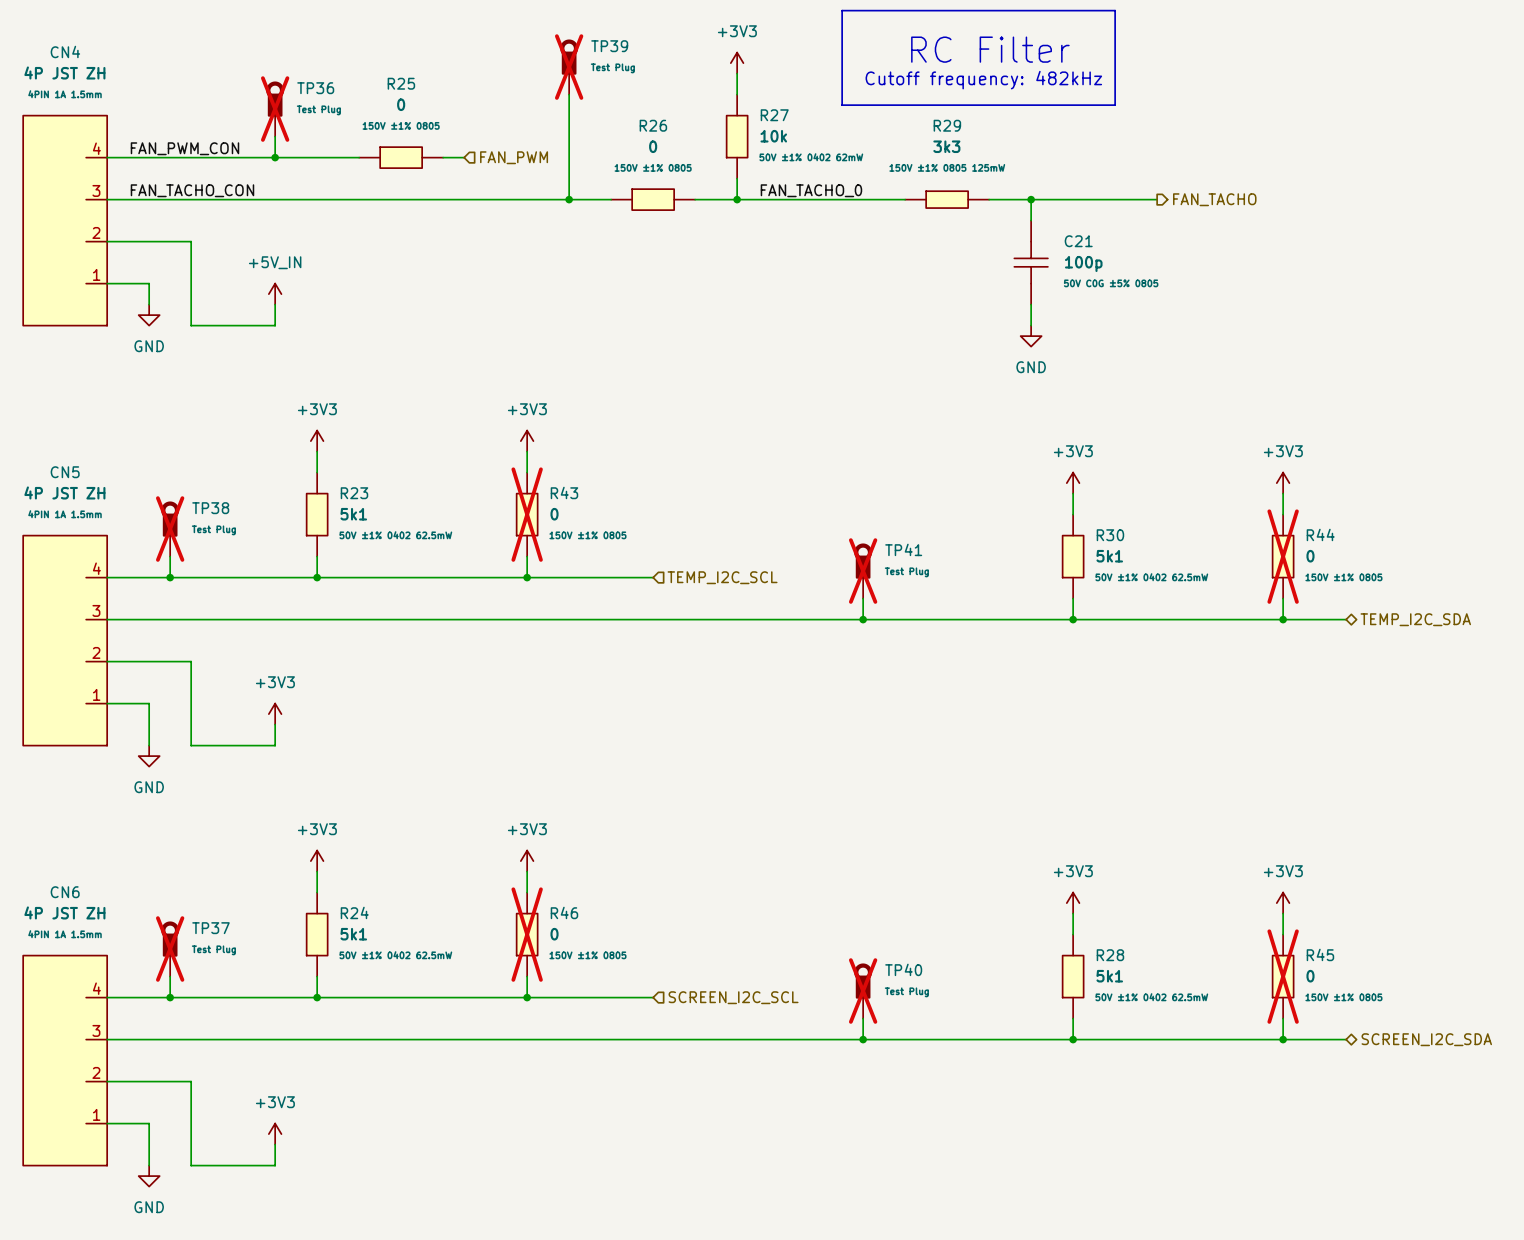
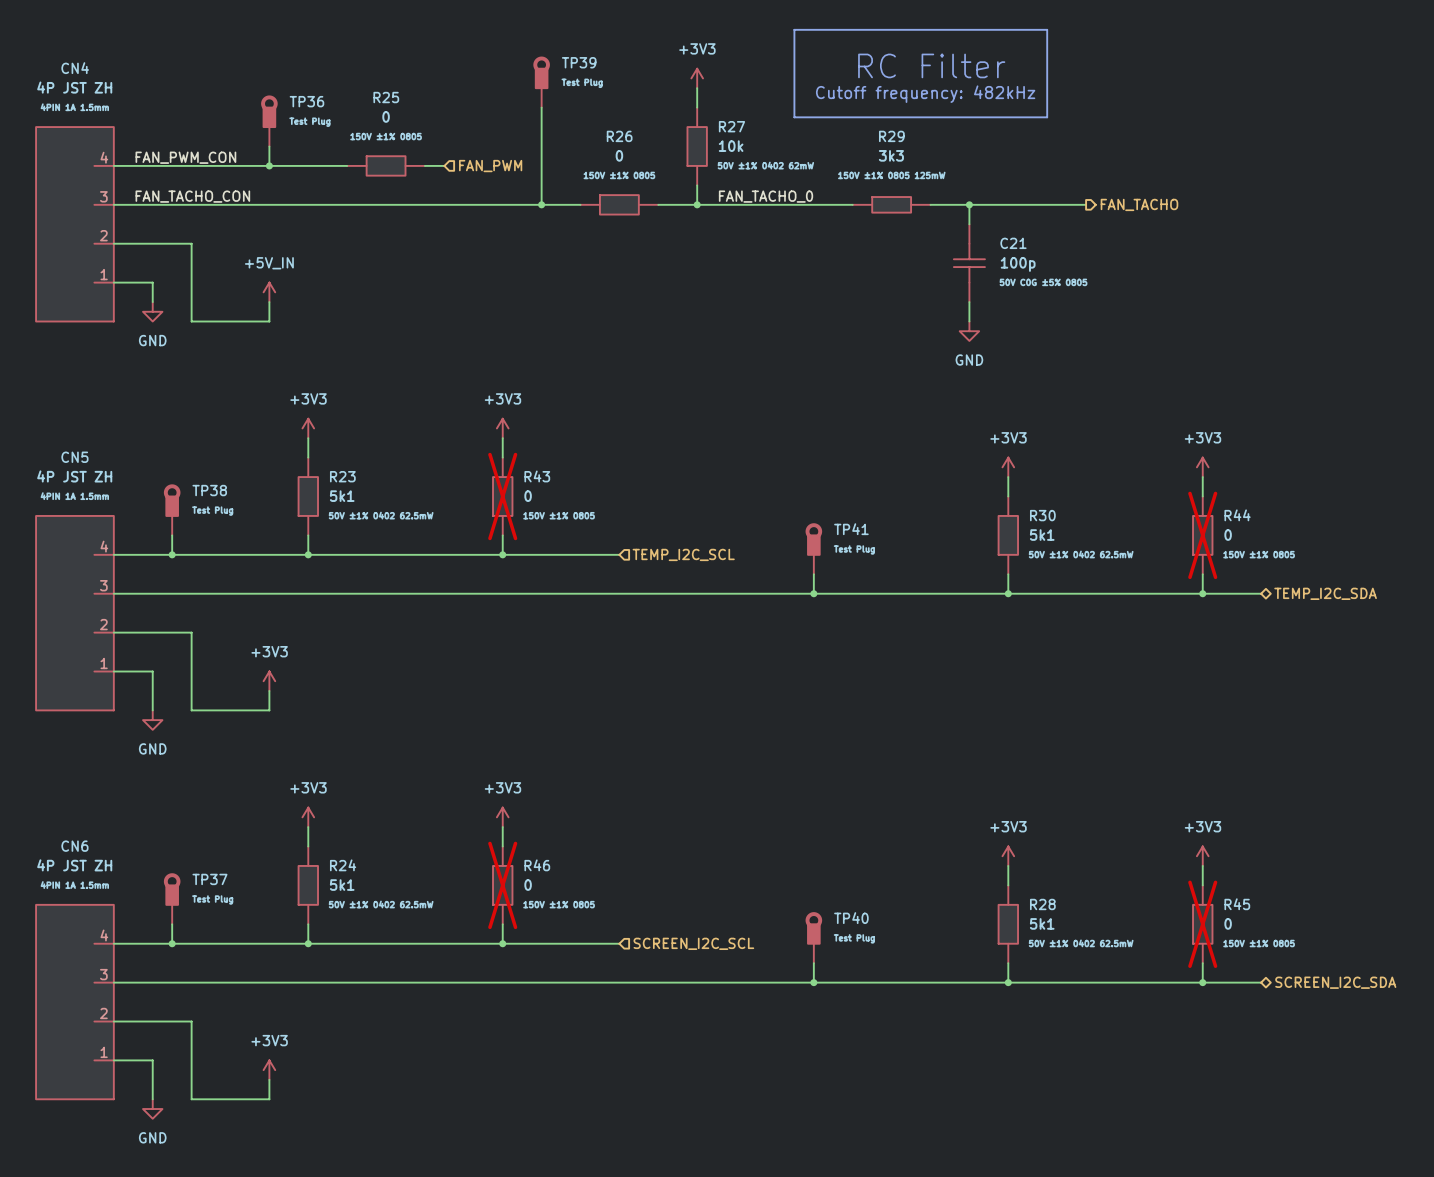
TP39 do-not-place cross: (569, 67) -> none
TP36 do-not-place cross: (275, 109) -> none
TP38 do-not-place cross: (170, 529) -> none
TP41 do-not-place cross: (863, 571) -> none
TP37 do-not-place cross: (170, 949) -> none
TP40 do-not-place cross: (863, 991) -> none

